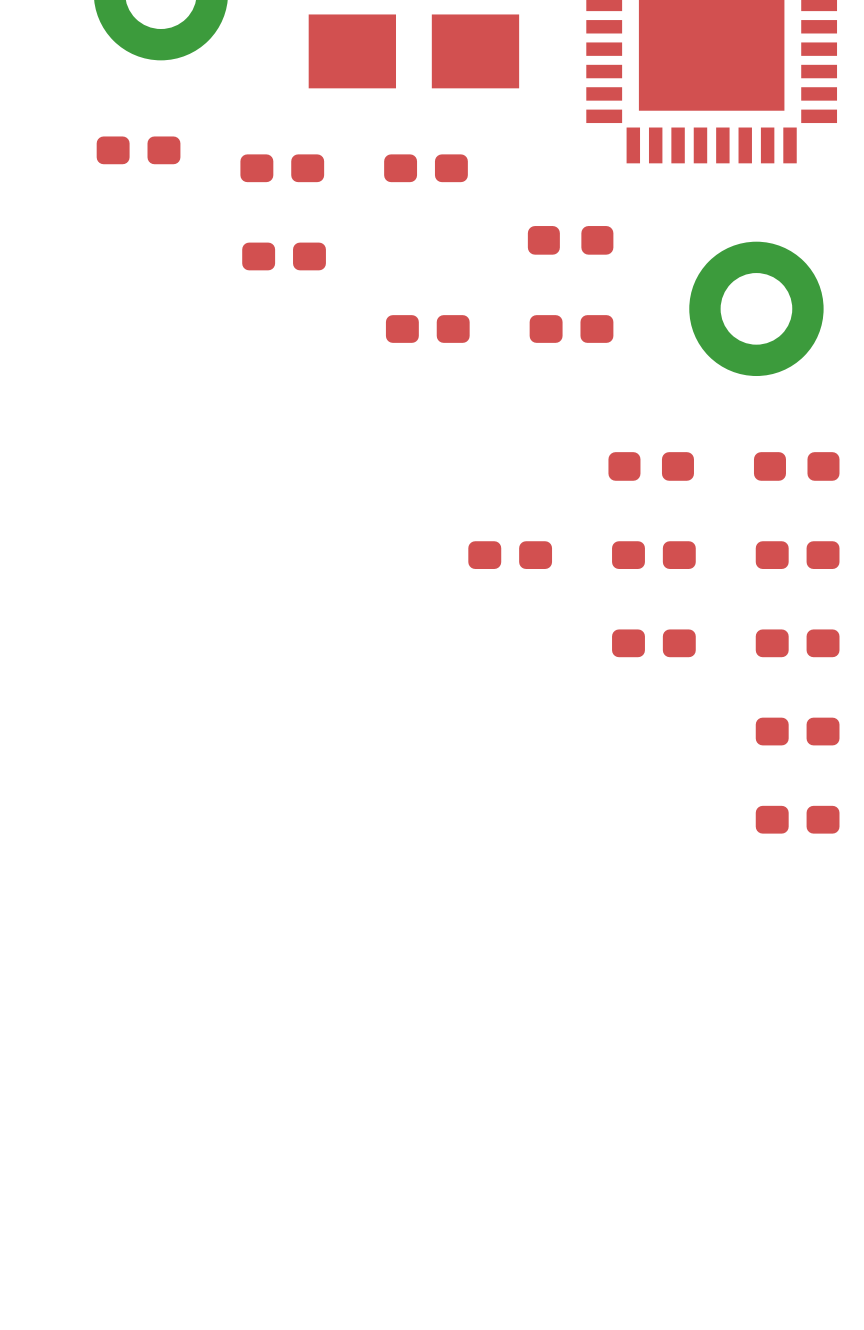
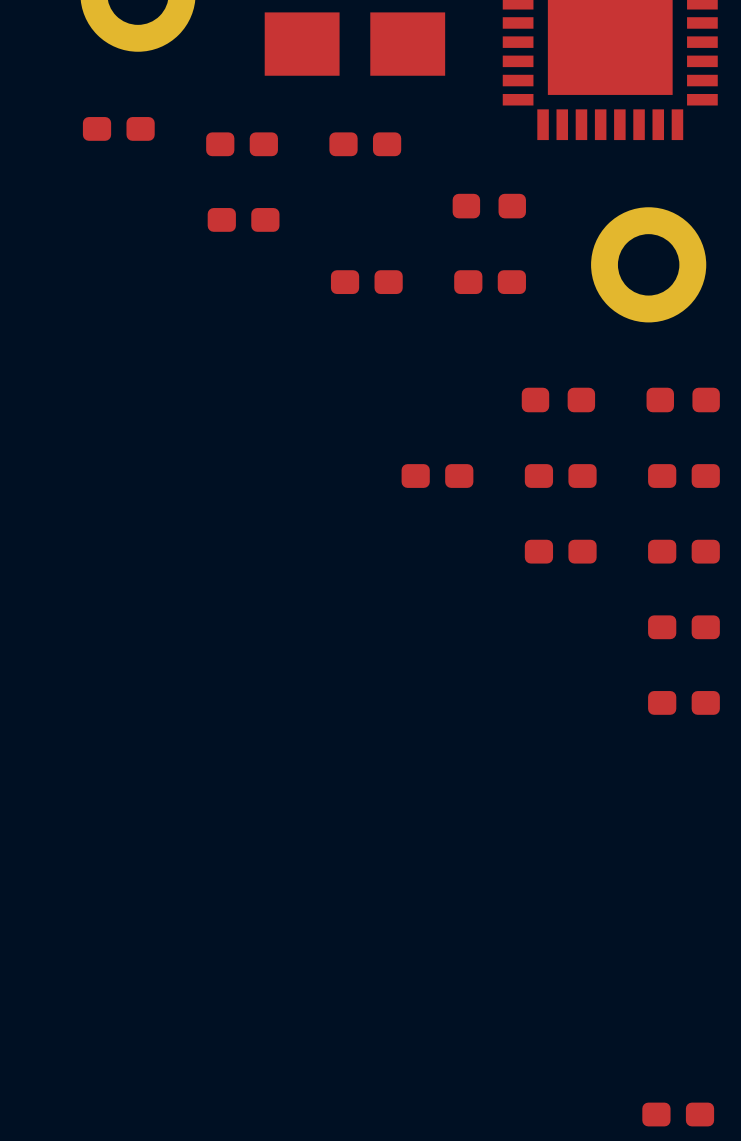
part: none -> (678, 1114)

